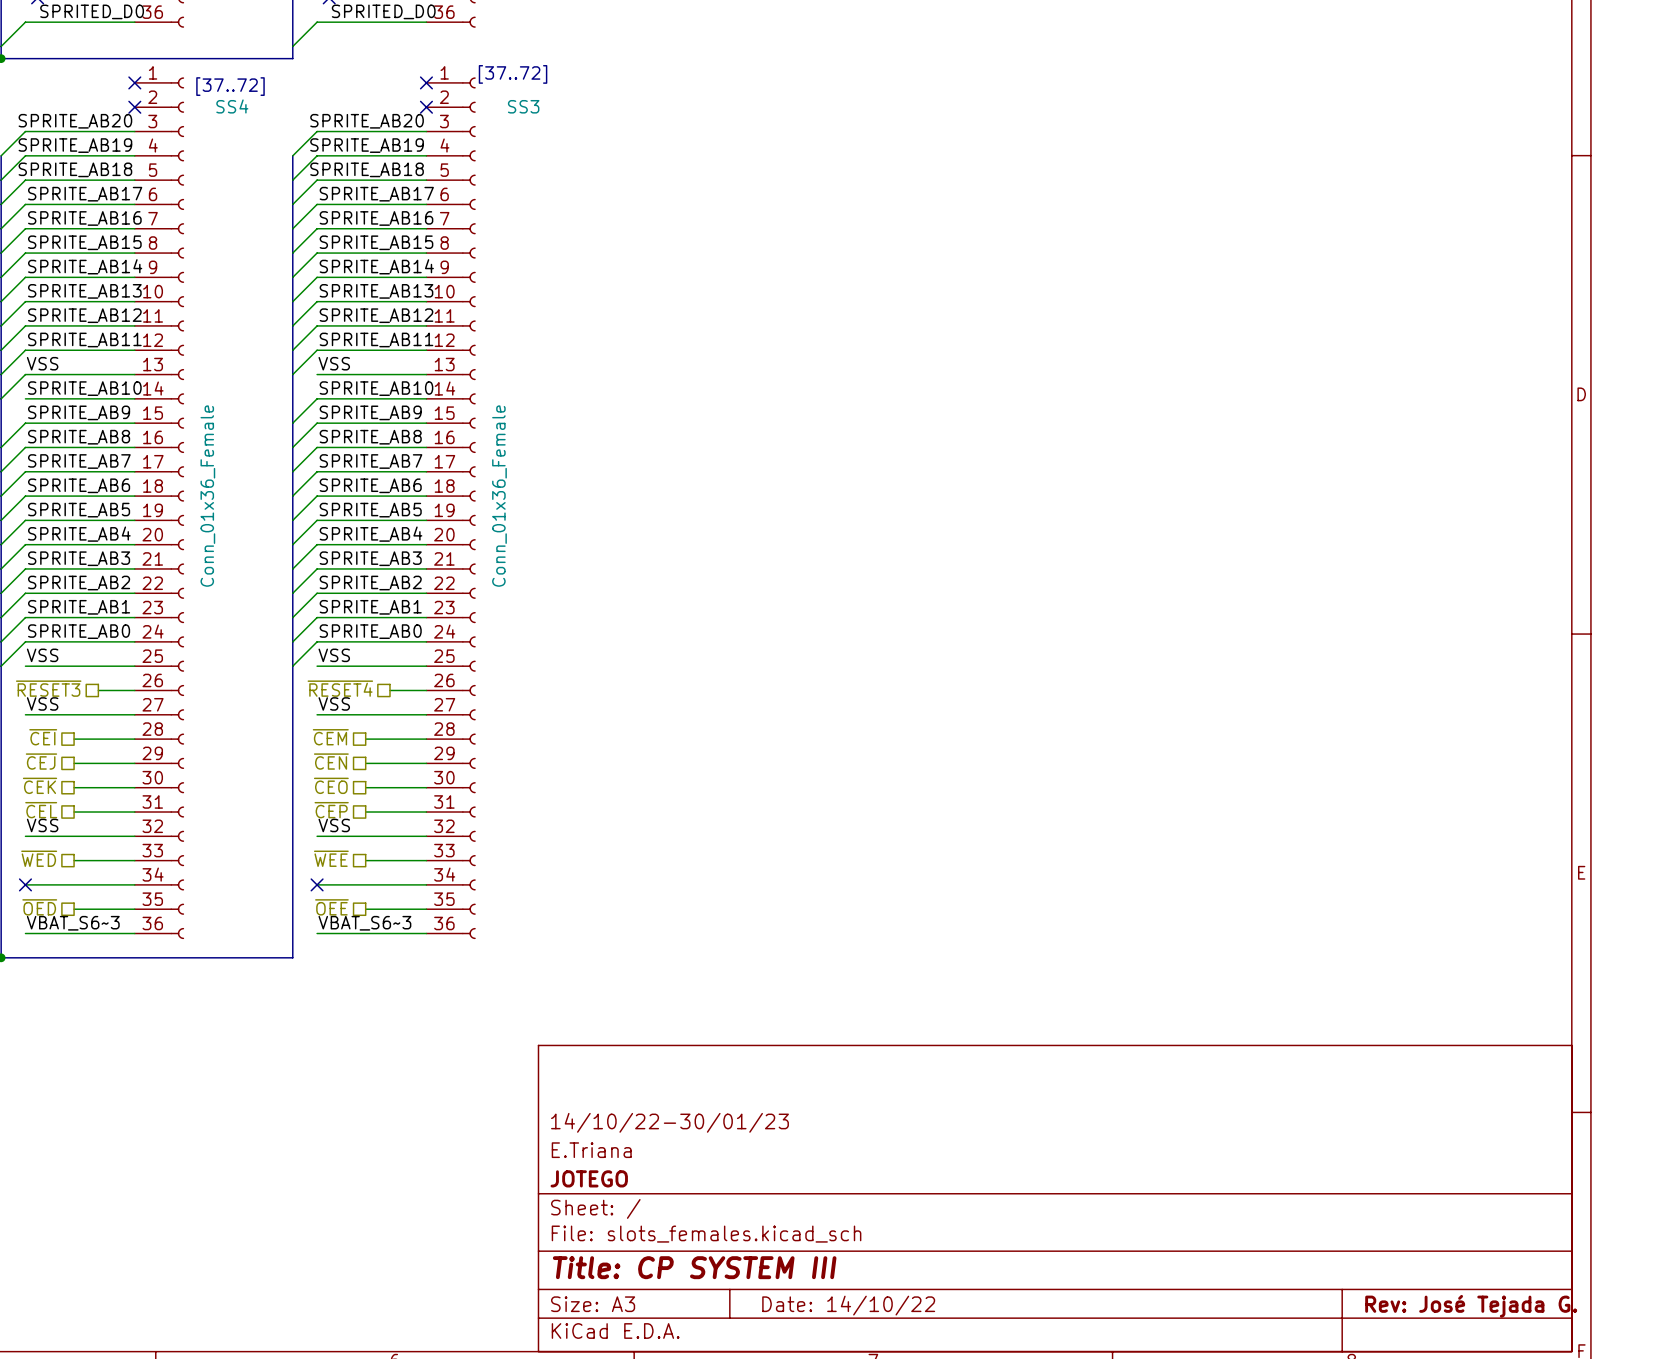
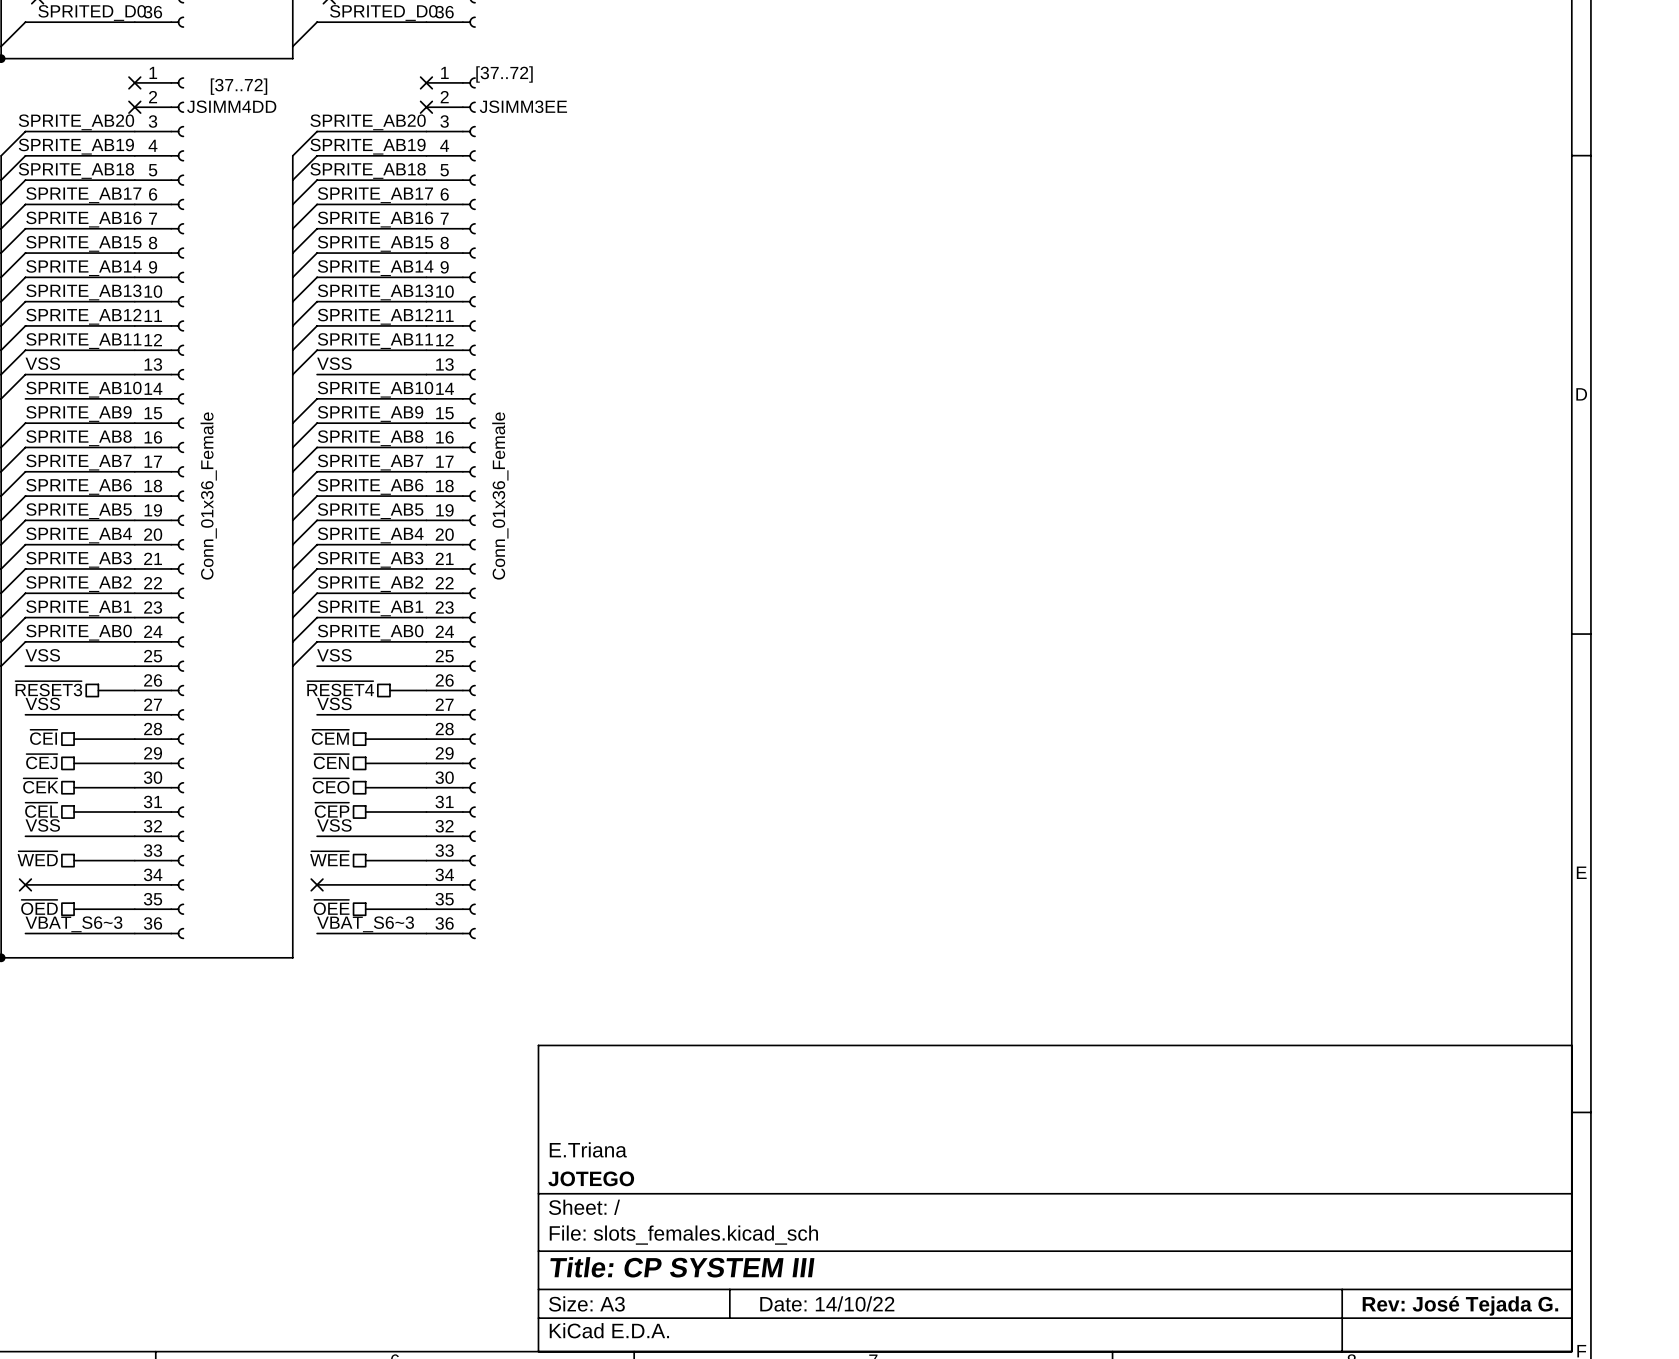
SS4 name: SS4 (232, 106) -> JSIMM4DD (231, 106)
SS3 name: SS3 (523, 106) -> JSIMM3EE (523, 106)
title block: 14/10/22-30/01/23 (669, 1122) -> none

